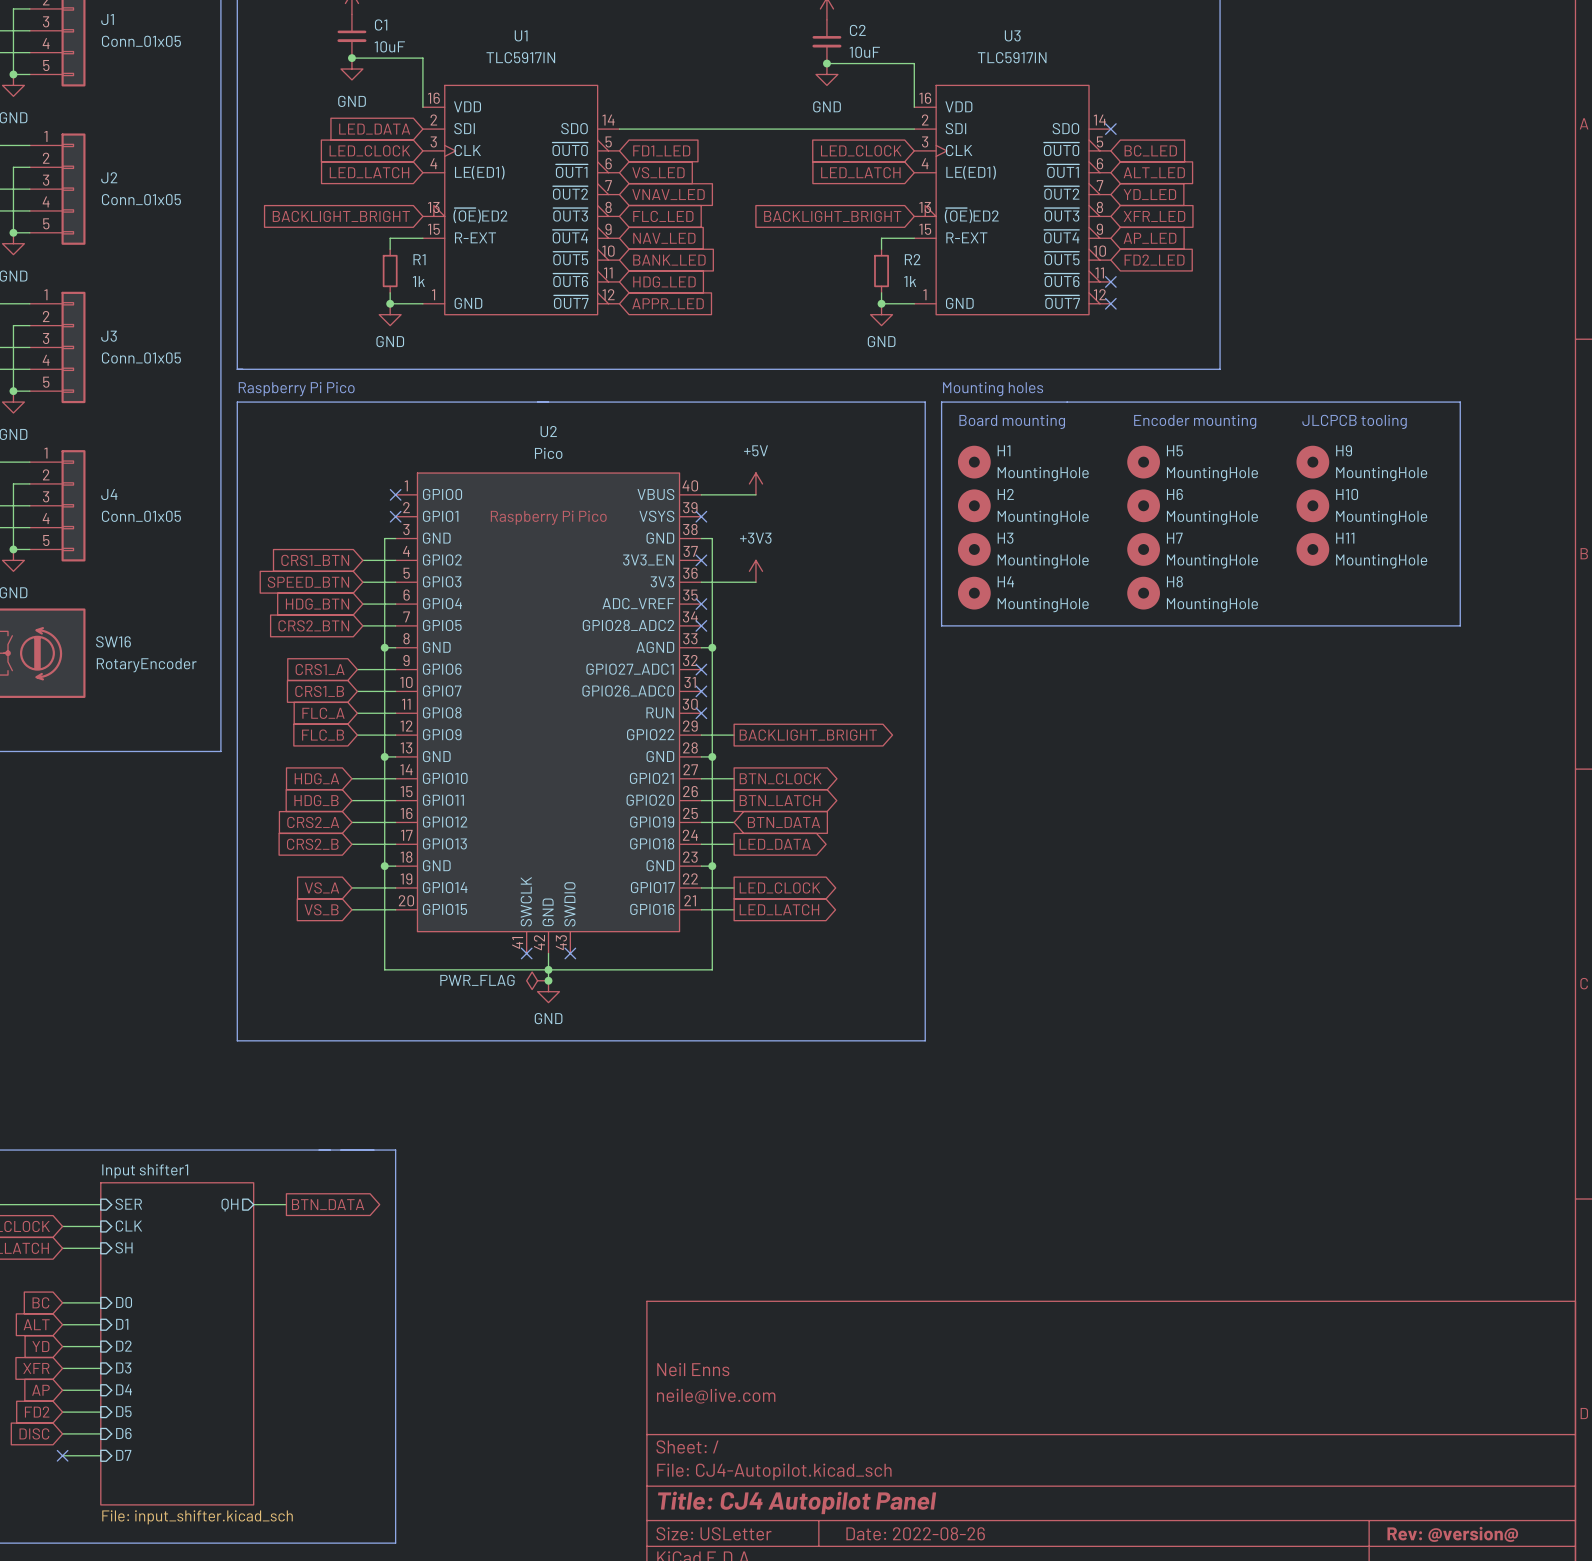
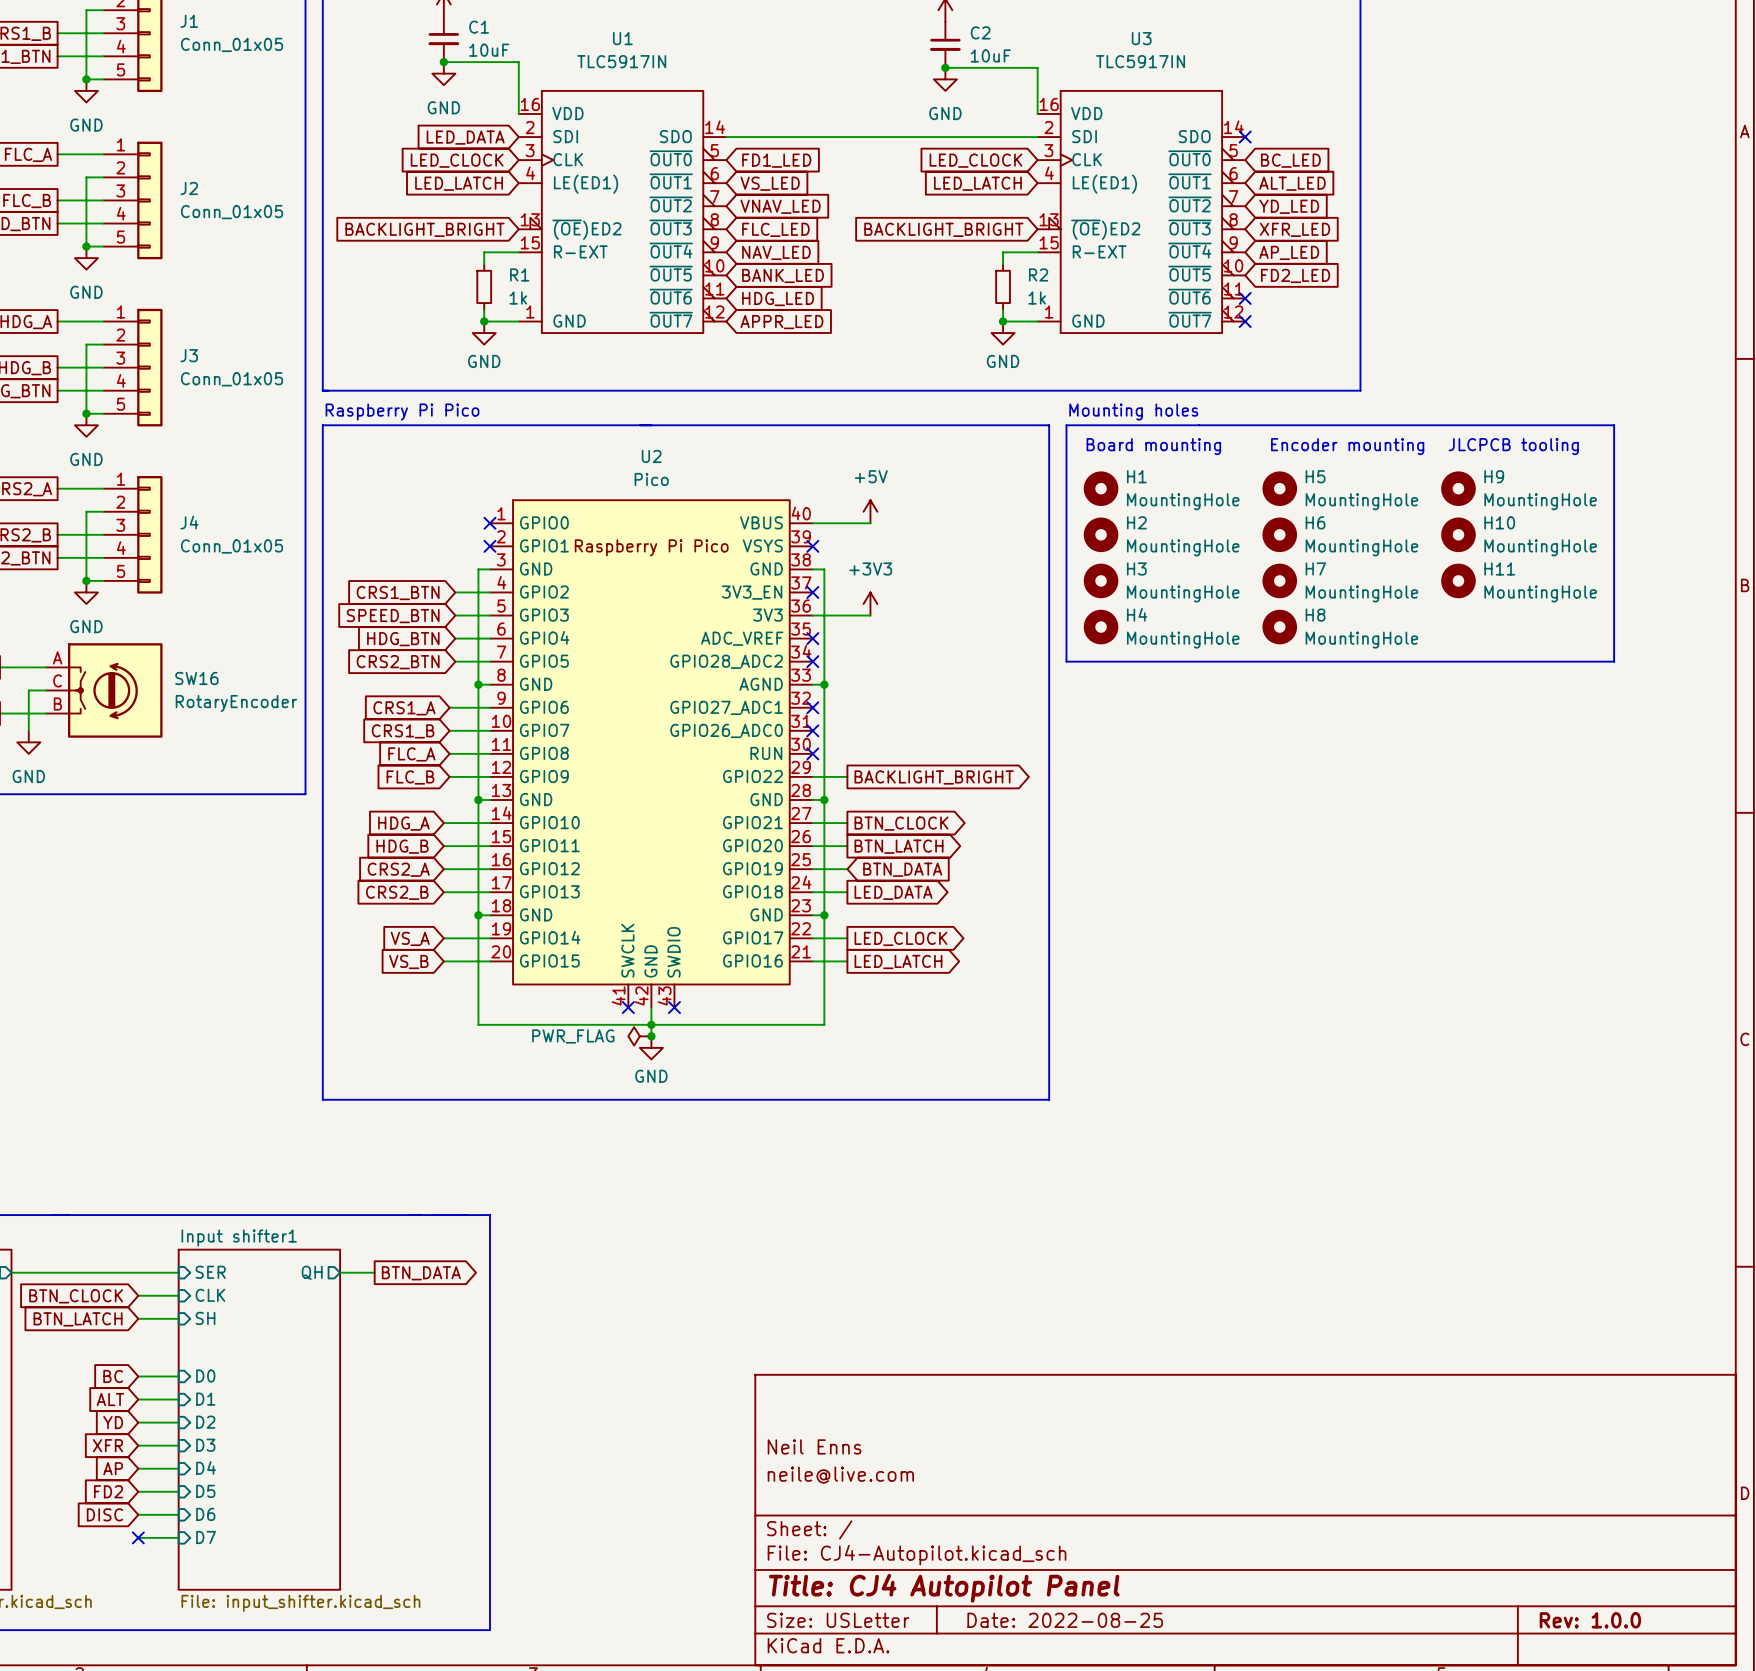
title block: Date: 2022-08-26 (915, 1533) -> Date: 2022-08-25 (1065, 1620)
title block: Rev: @version@ (1452, 1534) -> Rev: 1.0.0 (1590, 1620)

